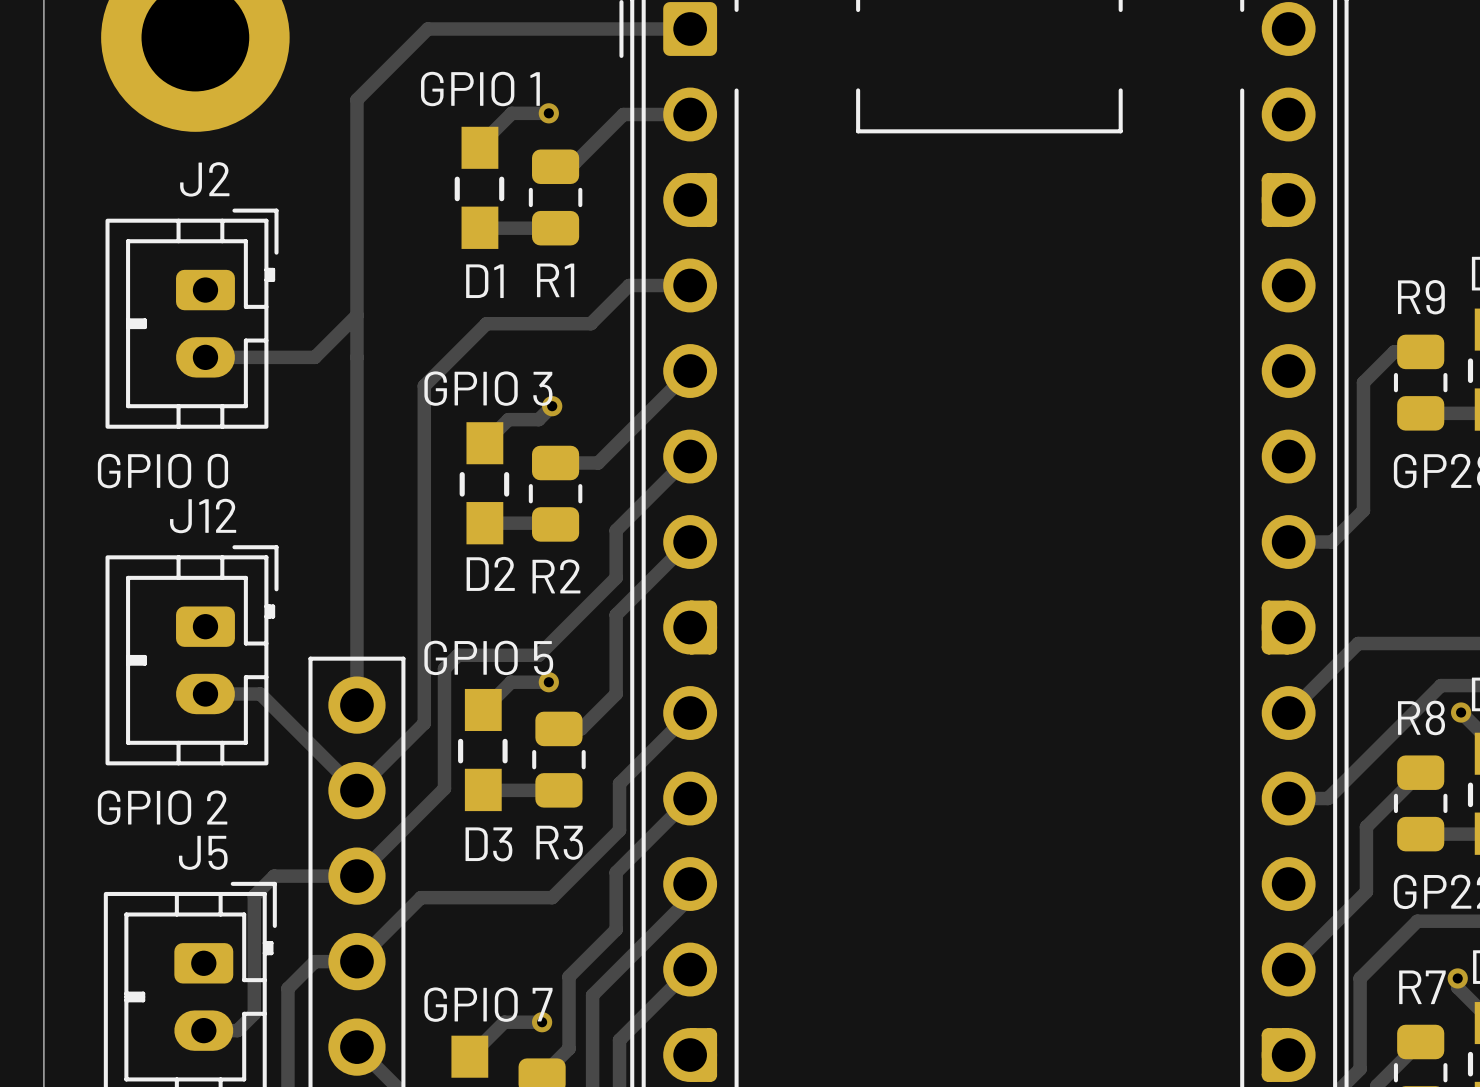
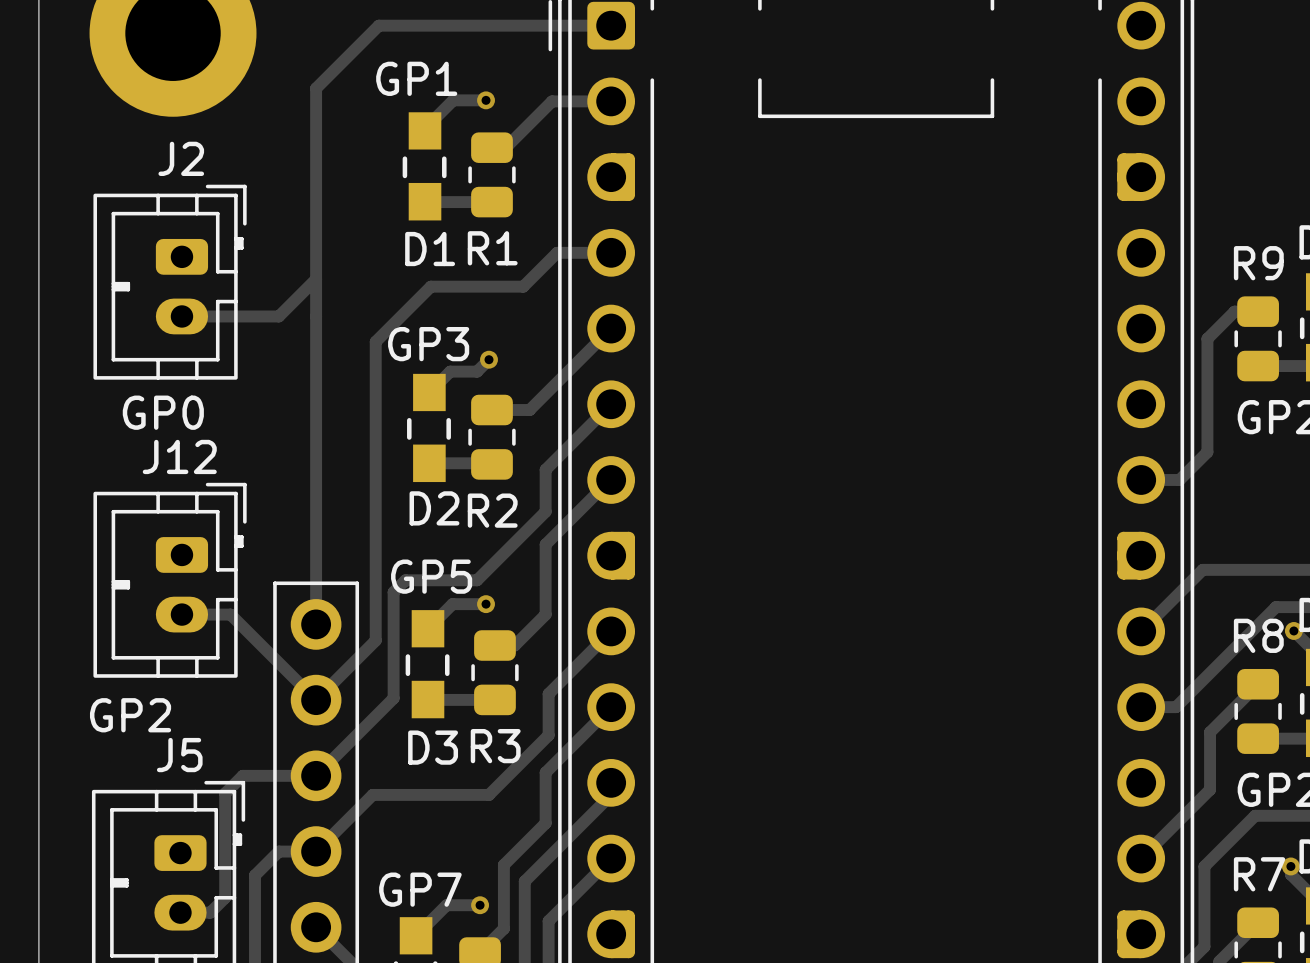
text: GPIO 1 (480, 89) -> GP1 (416, 78)
text: GPIO 3 (488, 388) -> GP3 (428, 344)
text: GPIO 0 (162, 471) -> GP0 (163, 412)
text: GPIO 5 (488, 657) -> GP5 (431, 576)
text: GPIO 2 (162, 807) -> GP2 (130, 715)
text: GPIO 7 (488, 1004) -> GP7 (420, 889)

